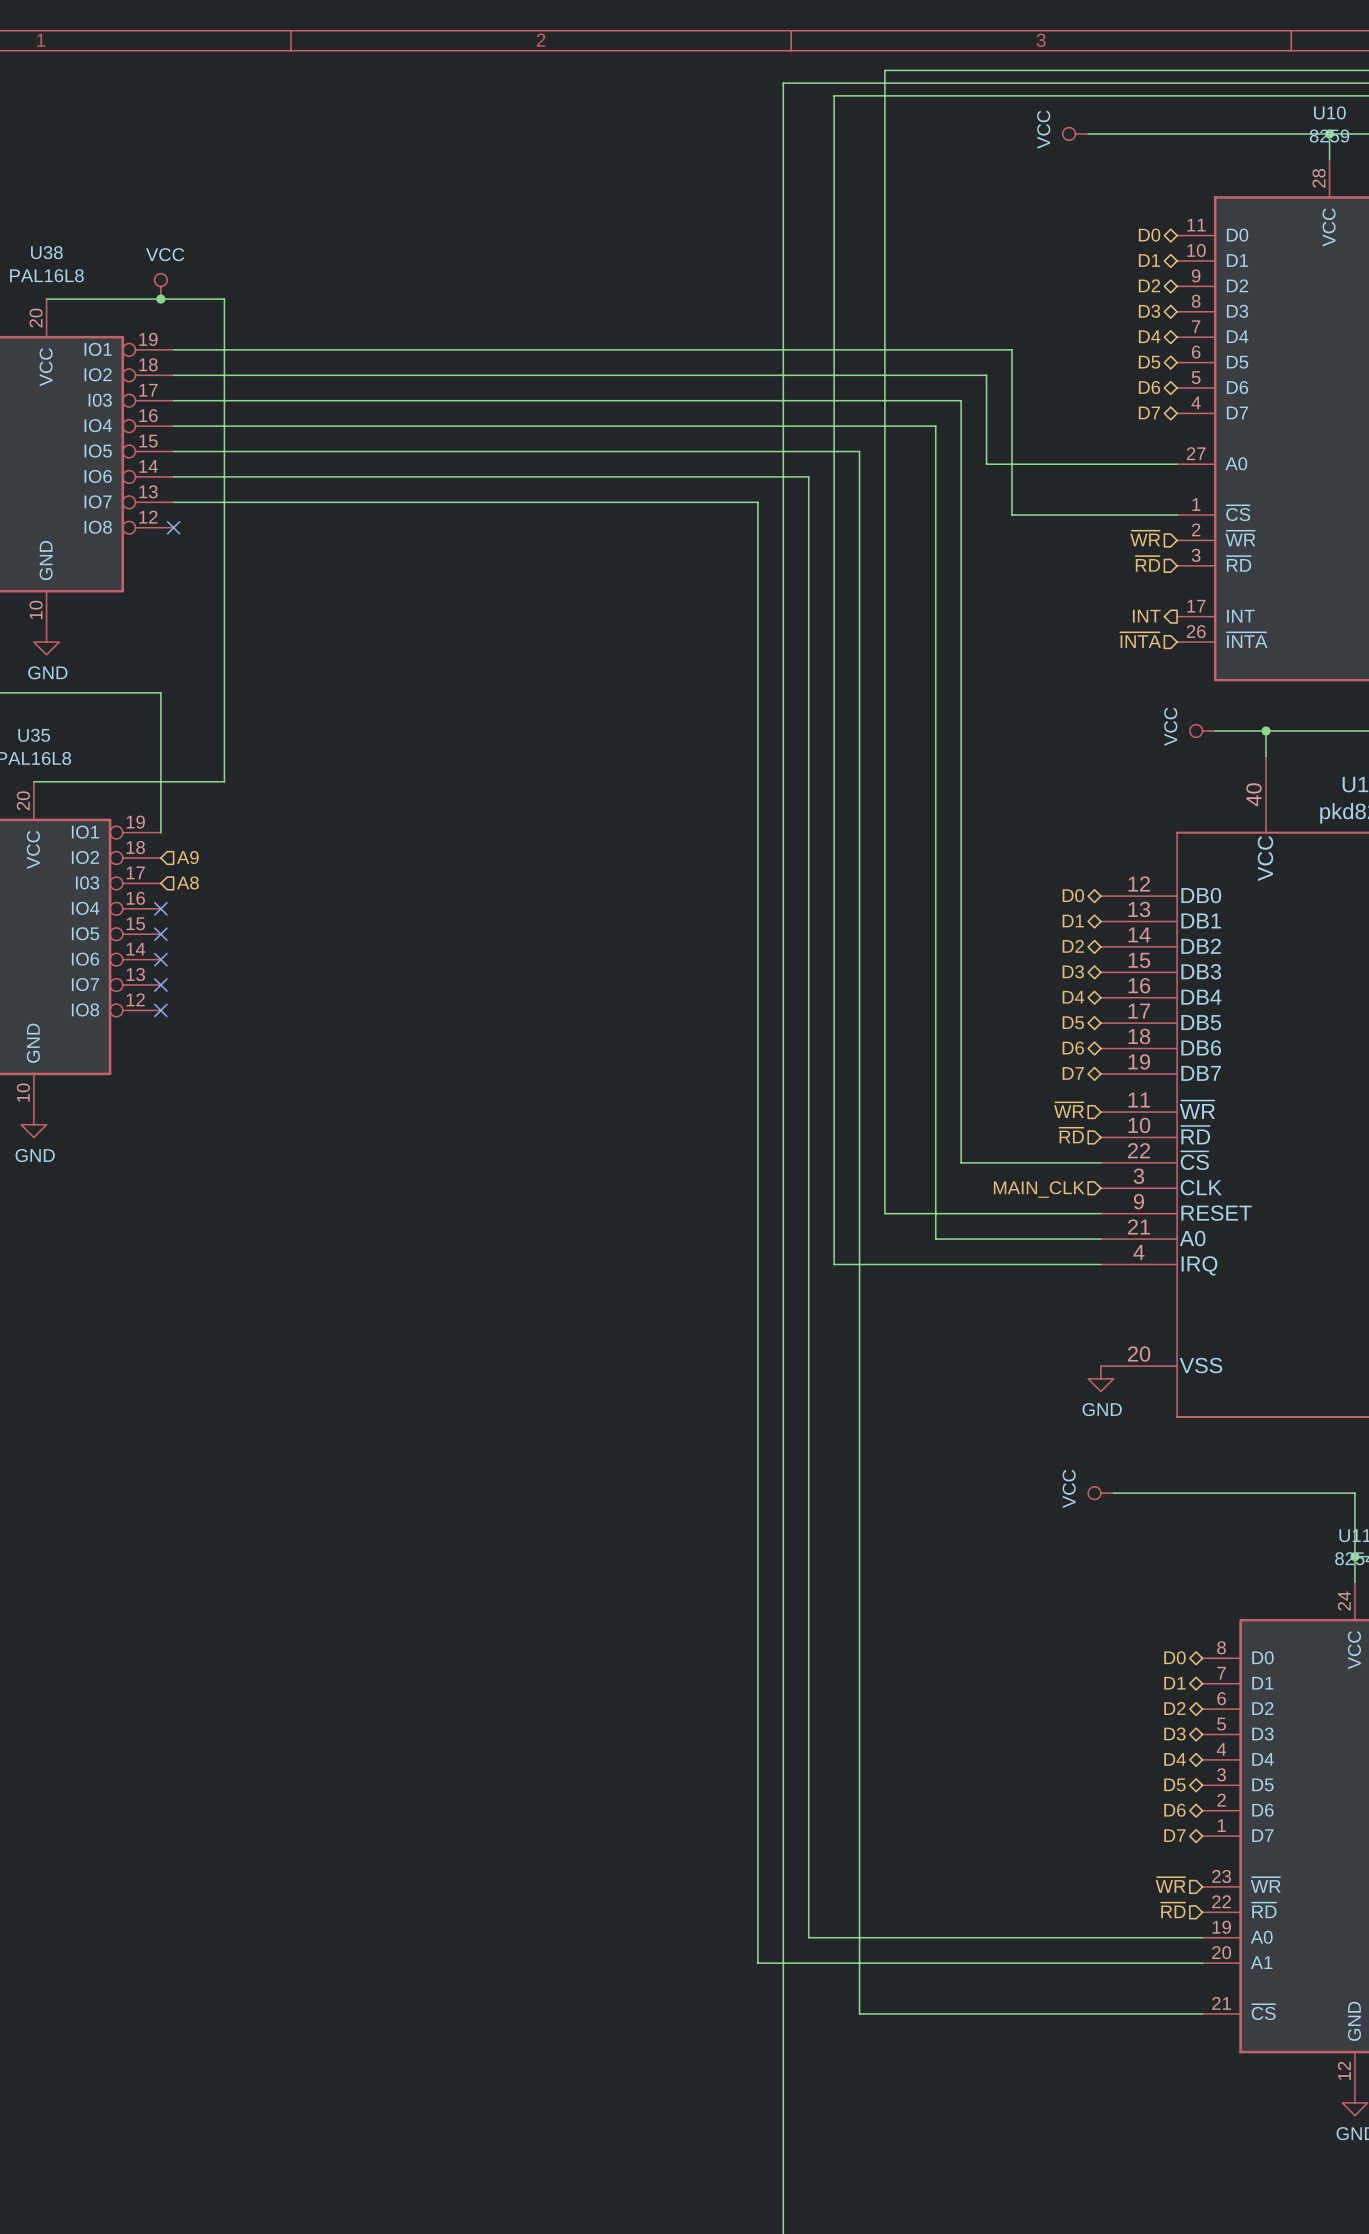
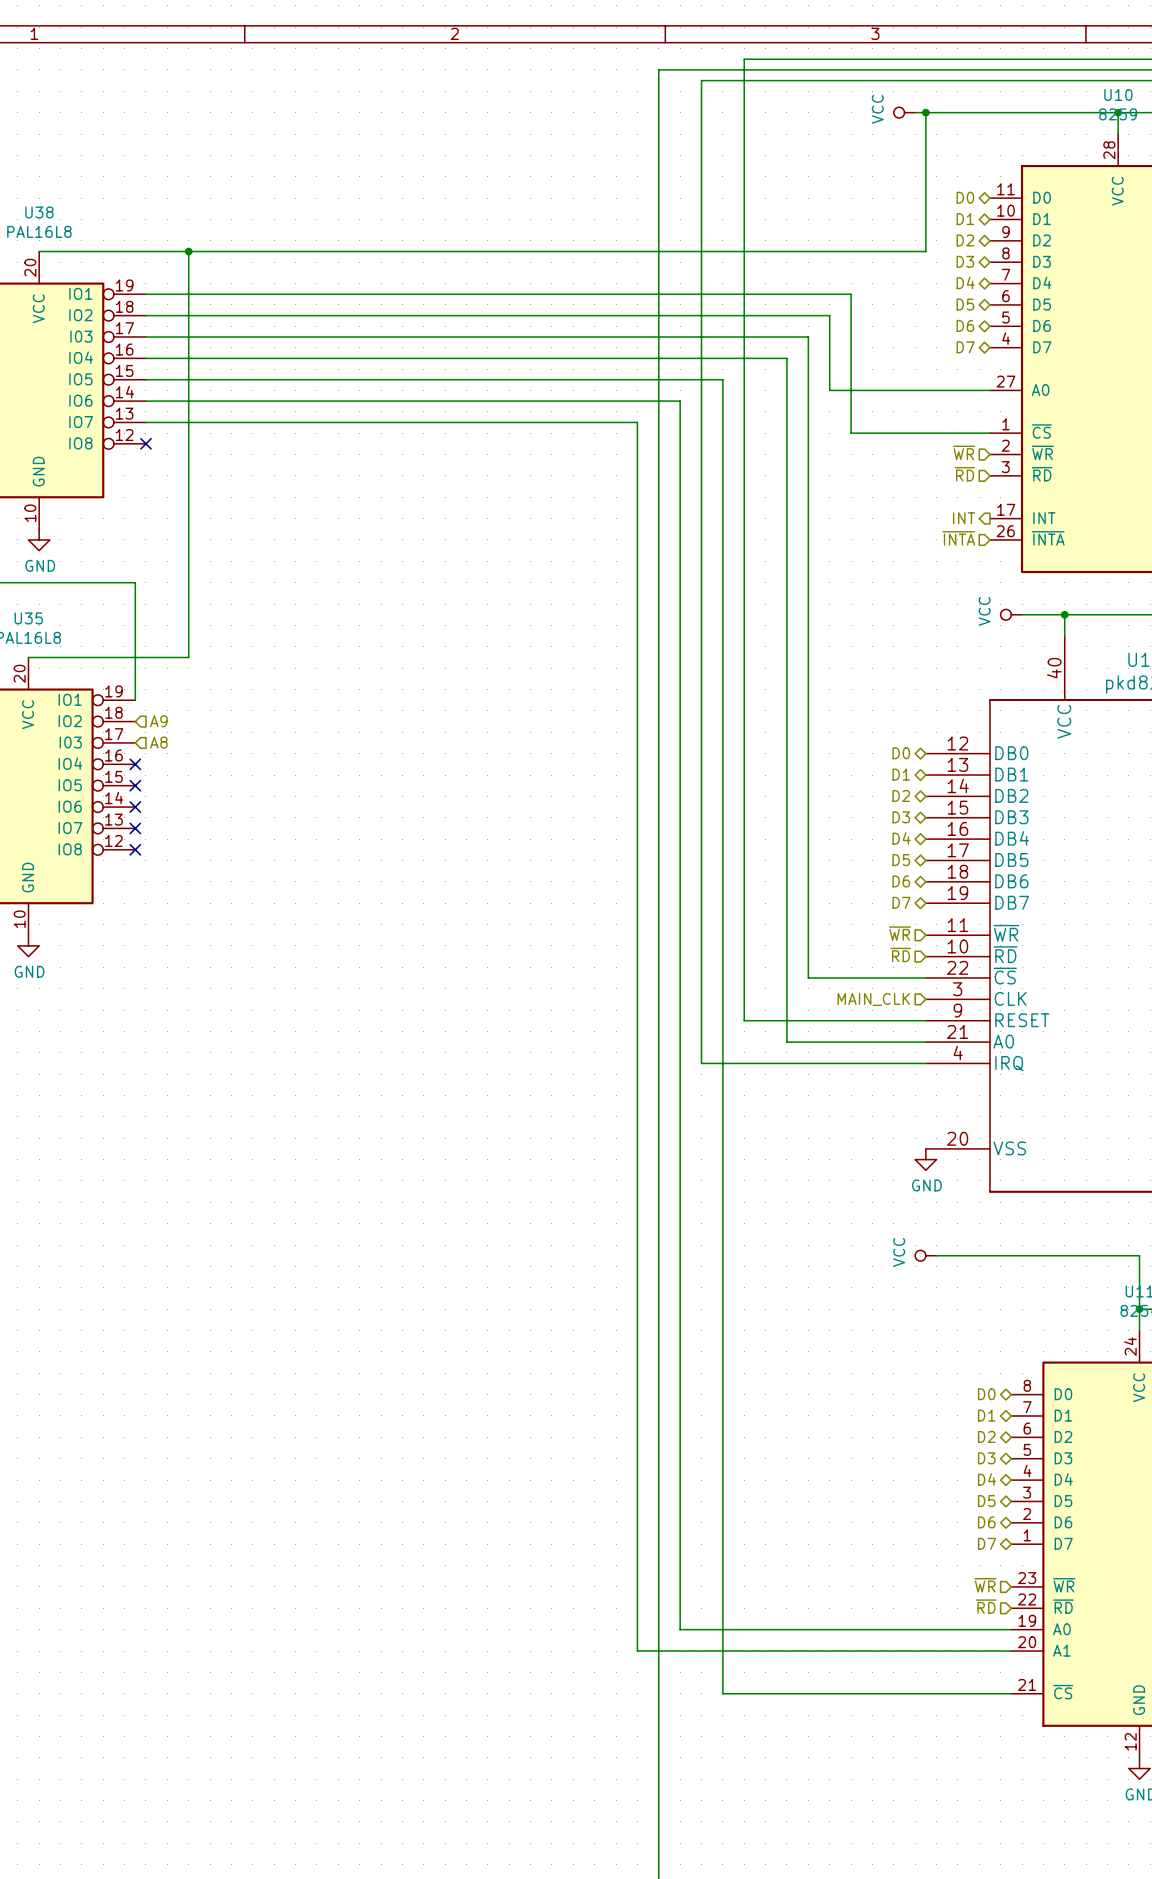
wire: none -> (925, 112) (925, 251) (188, 251)
junction: none -> (925, 112)
power symbol: VCC (160, 286) -> none
junction: (160, 299) -> none
junction: none -> (188, 251)

